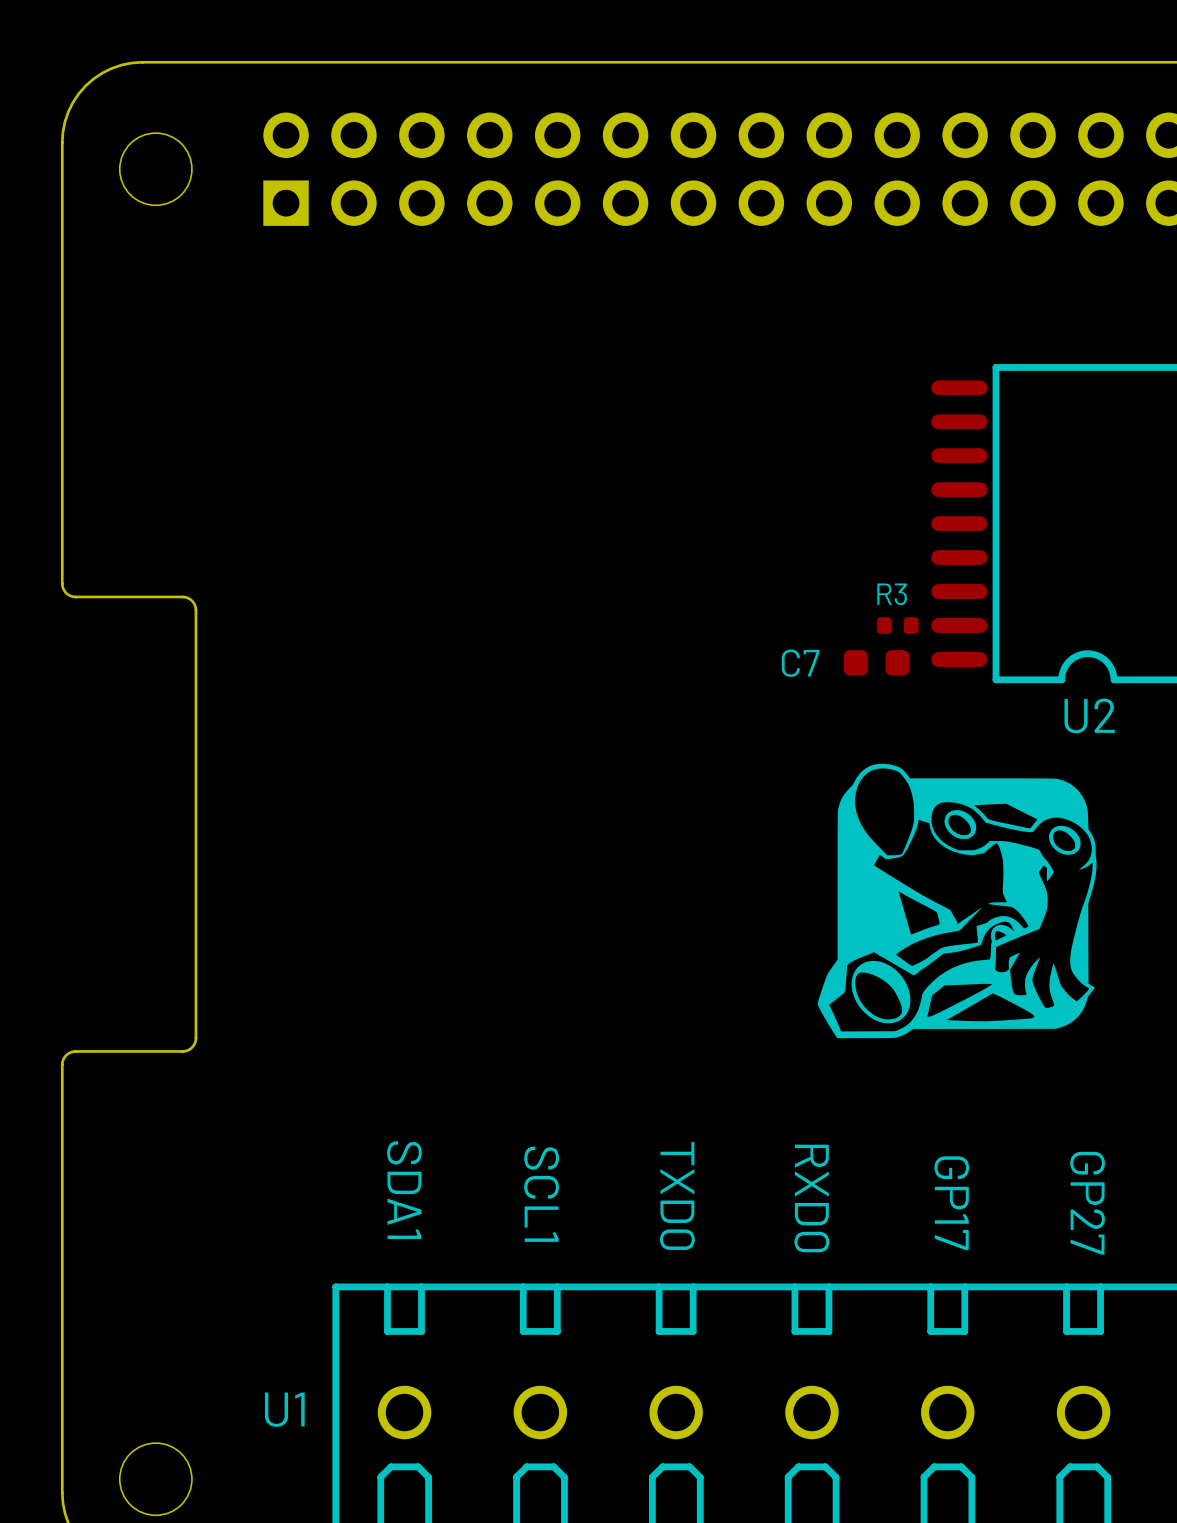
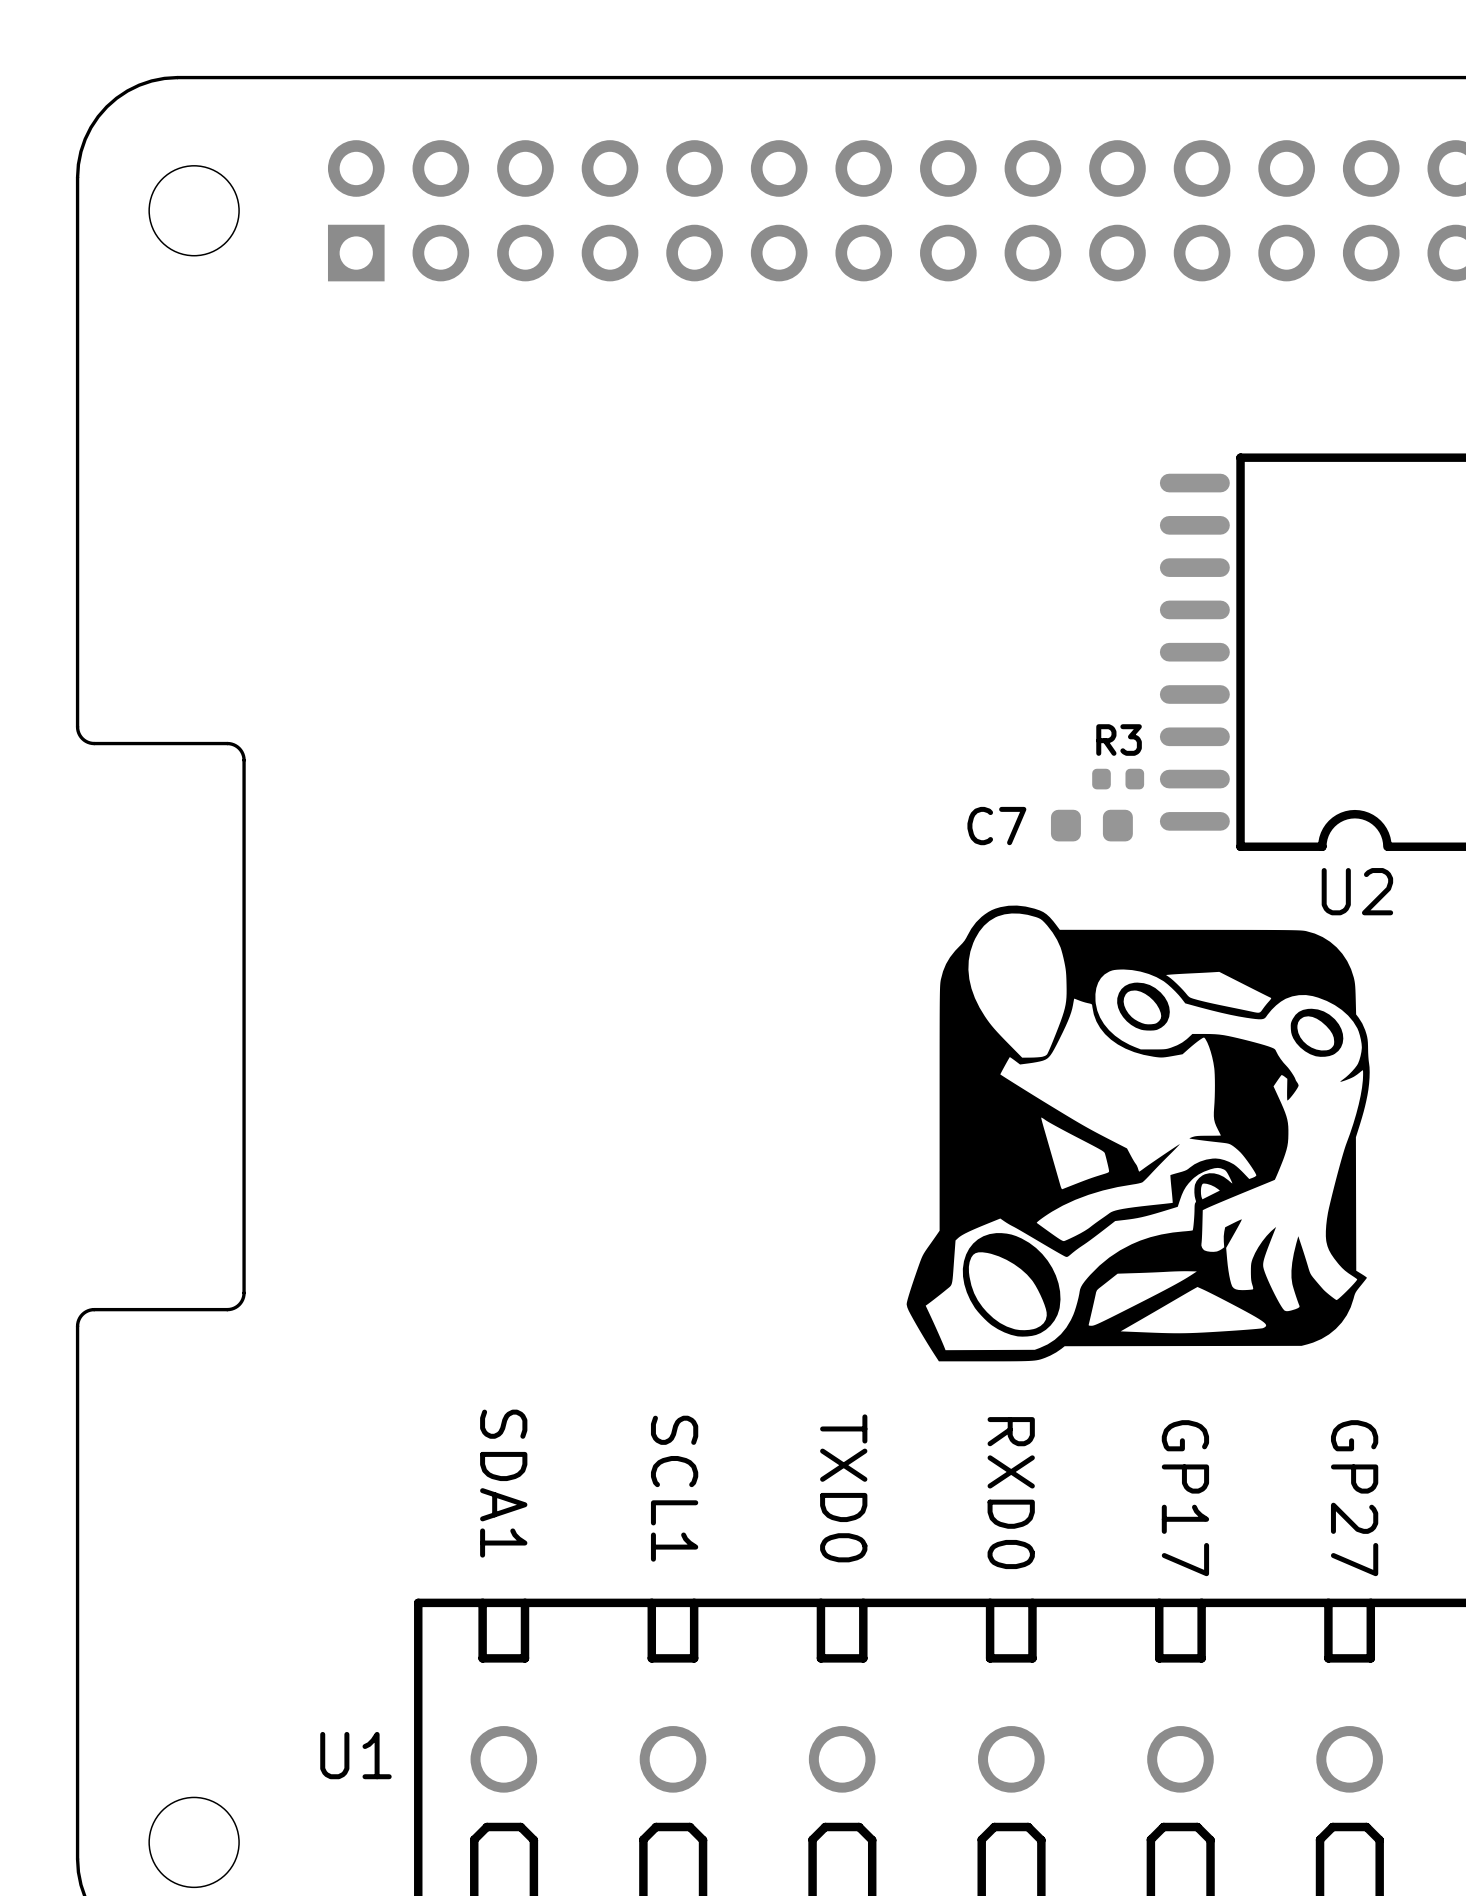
drawing: none -> [906, 905, 1370, 1362]
drawing: [817, 763, 1097, 1039] -> none

